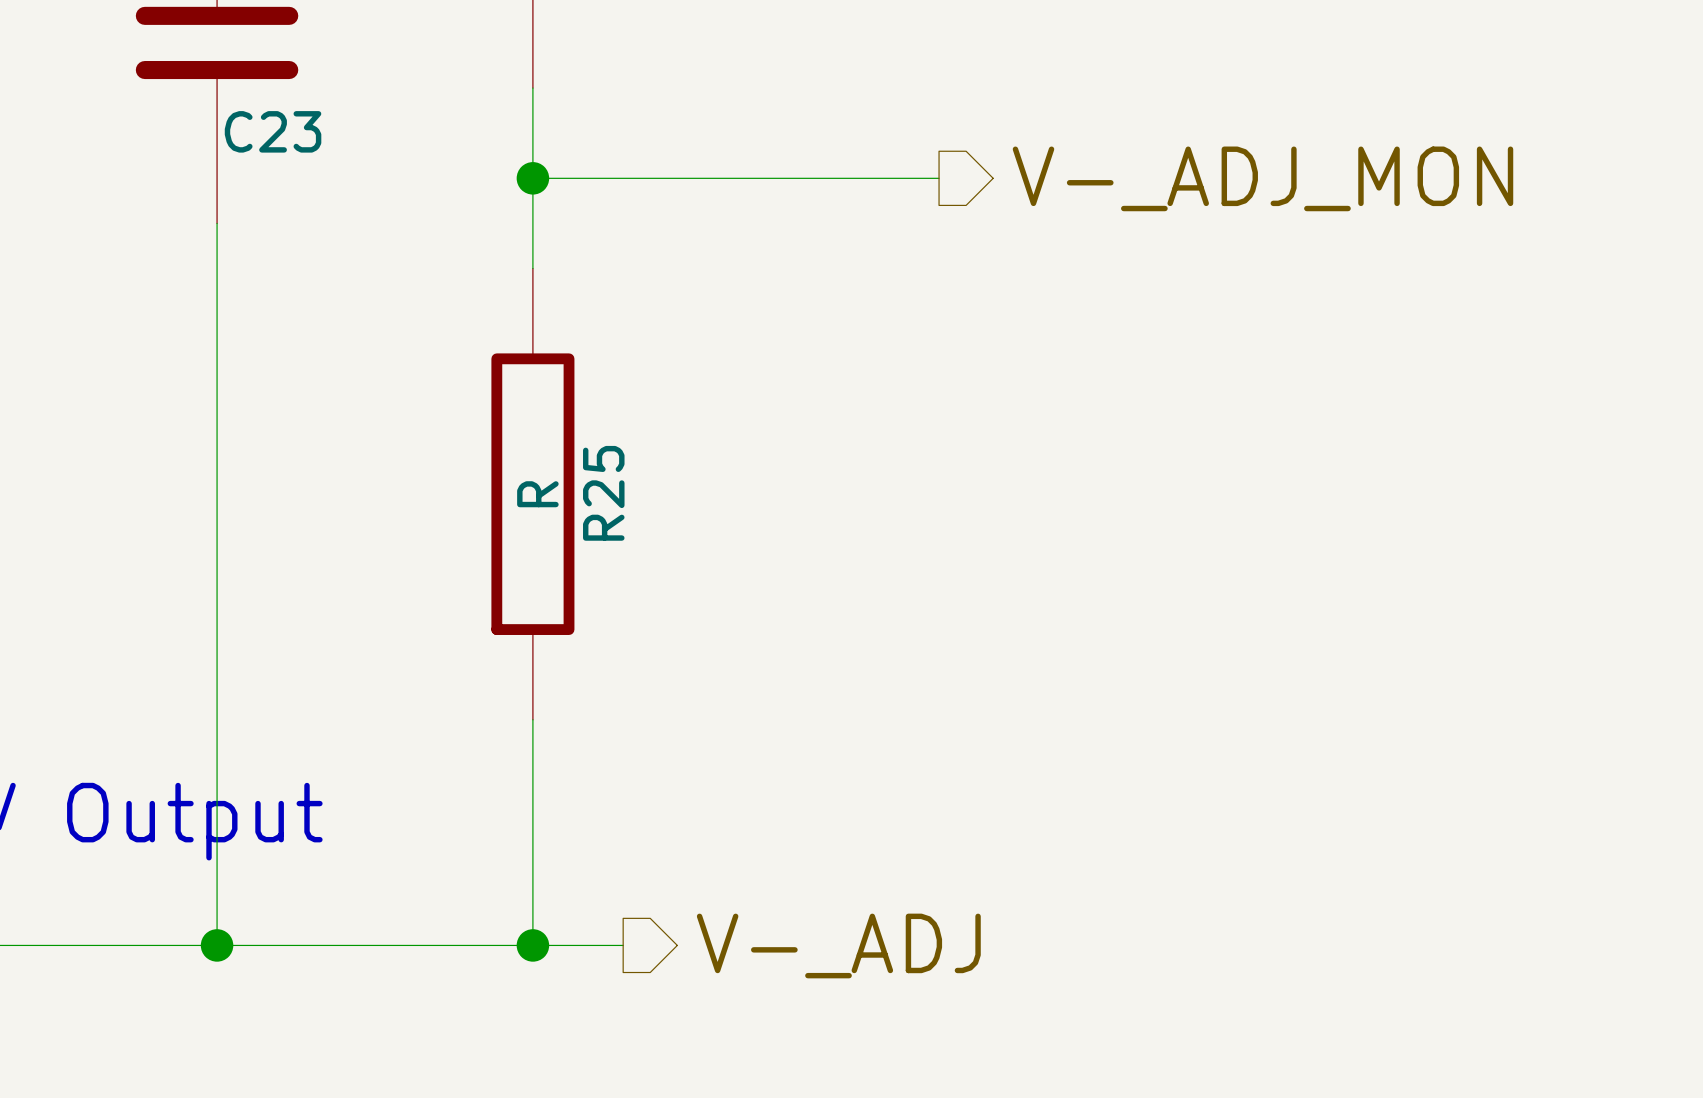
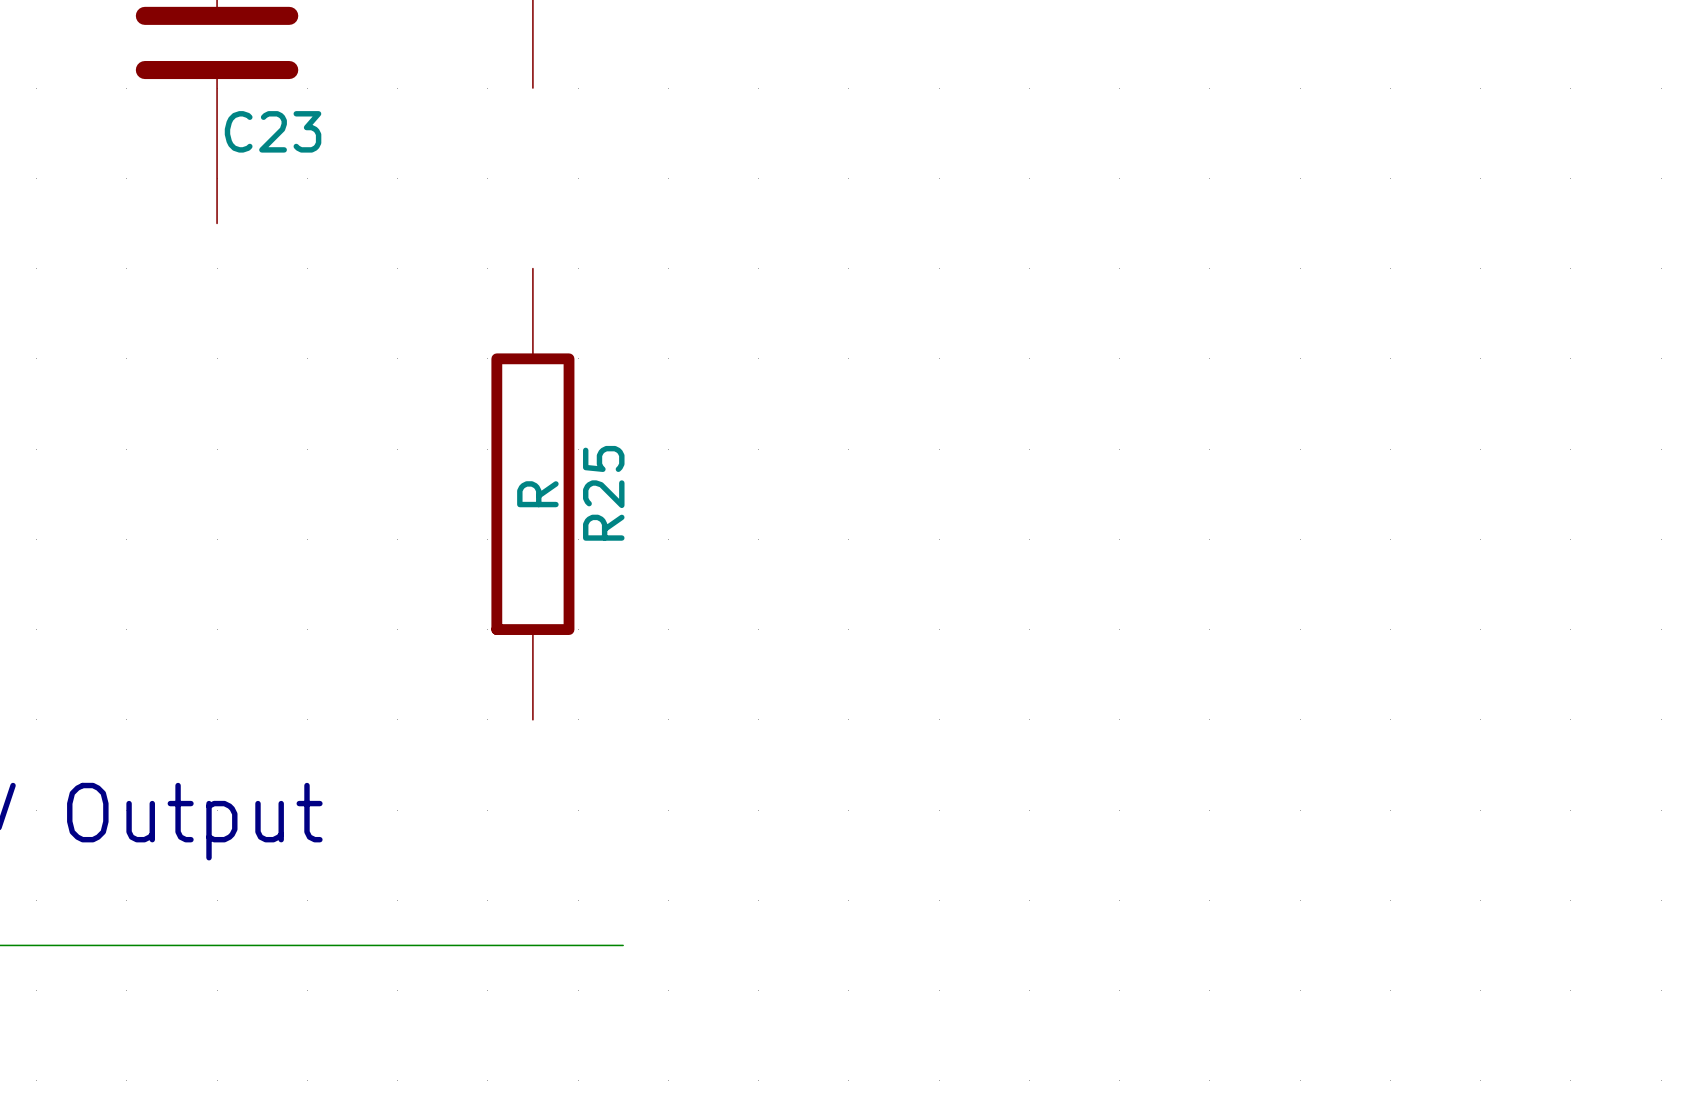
wire: (532, 88) (532, 268) -> none
wire: (532, 178) (939, 178) -> none
junction: (532, 178) -> none
hierarchical label: V-_ADJ_MON (1262, 178) -> none
wire: (217, 223) (217, 945) -> none
wire: (532, 719) (532, 945) -> none
junction: (217, 945) -> none
junction: (532, 945) -> none
hierarchical label: V-_ADJ (838, 945) -> none

